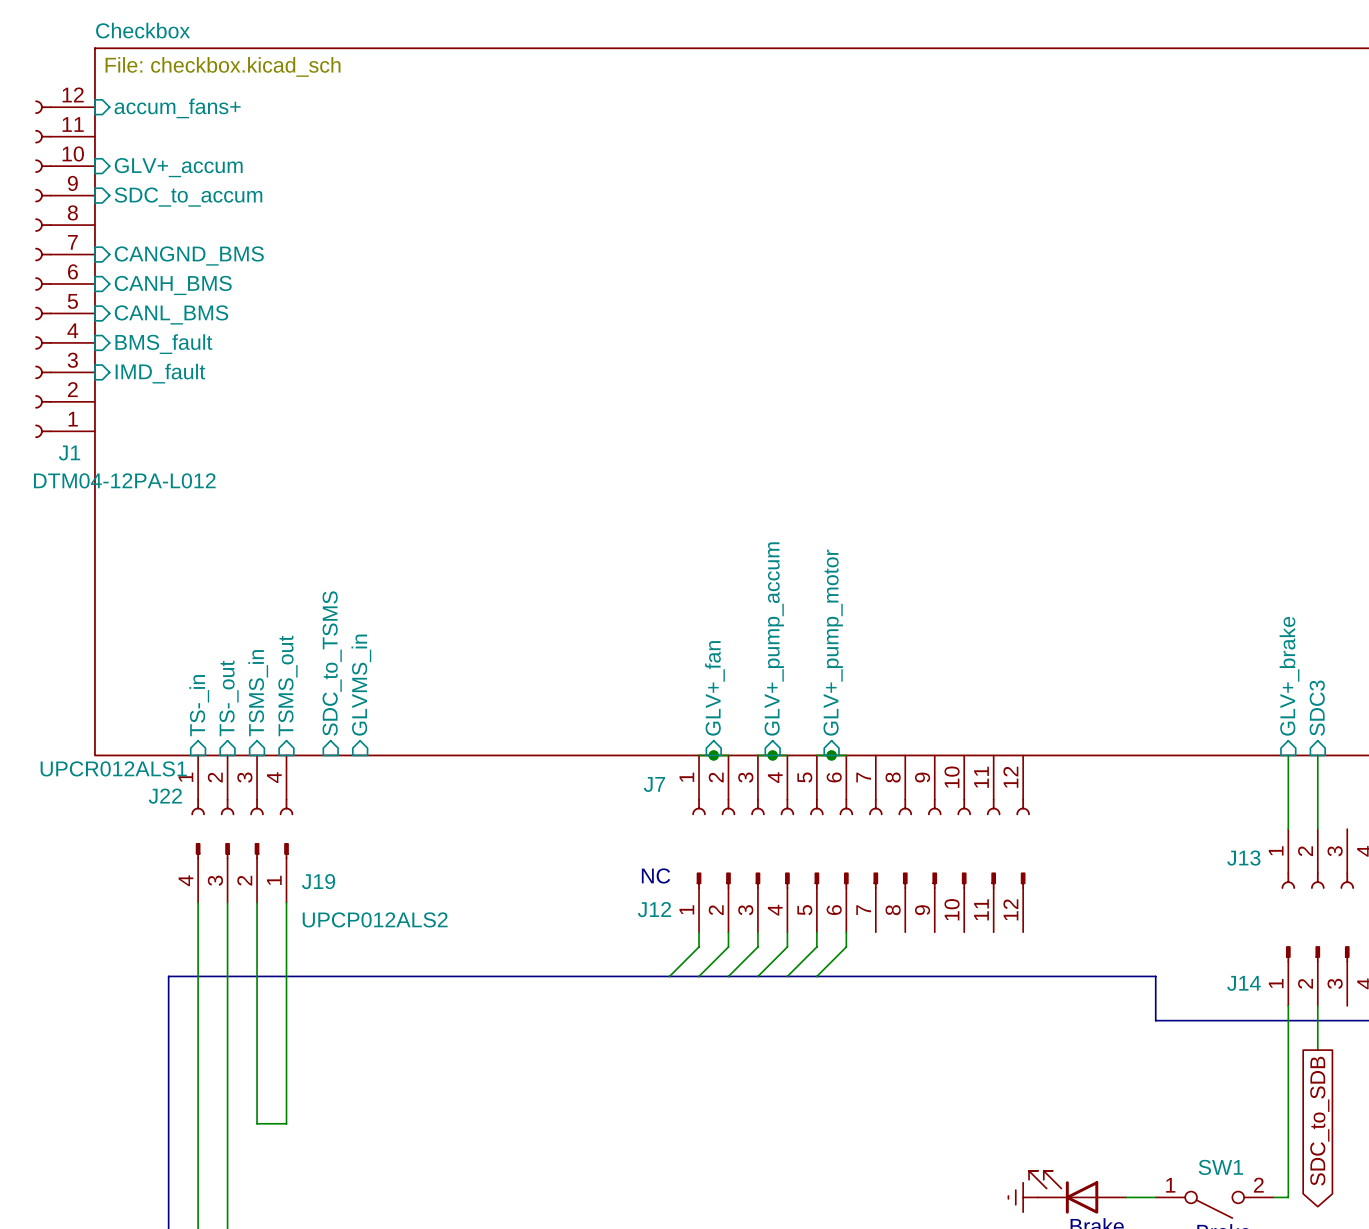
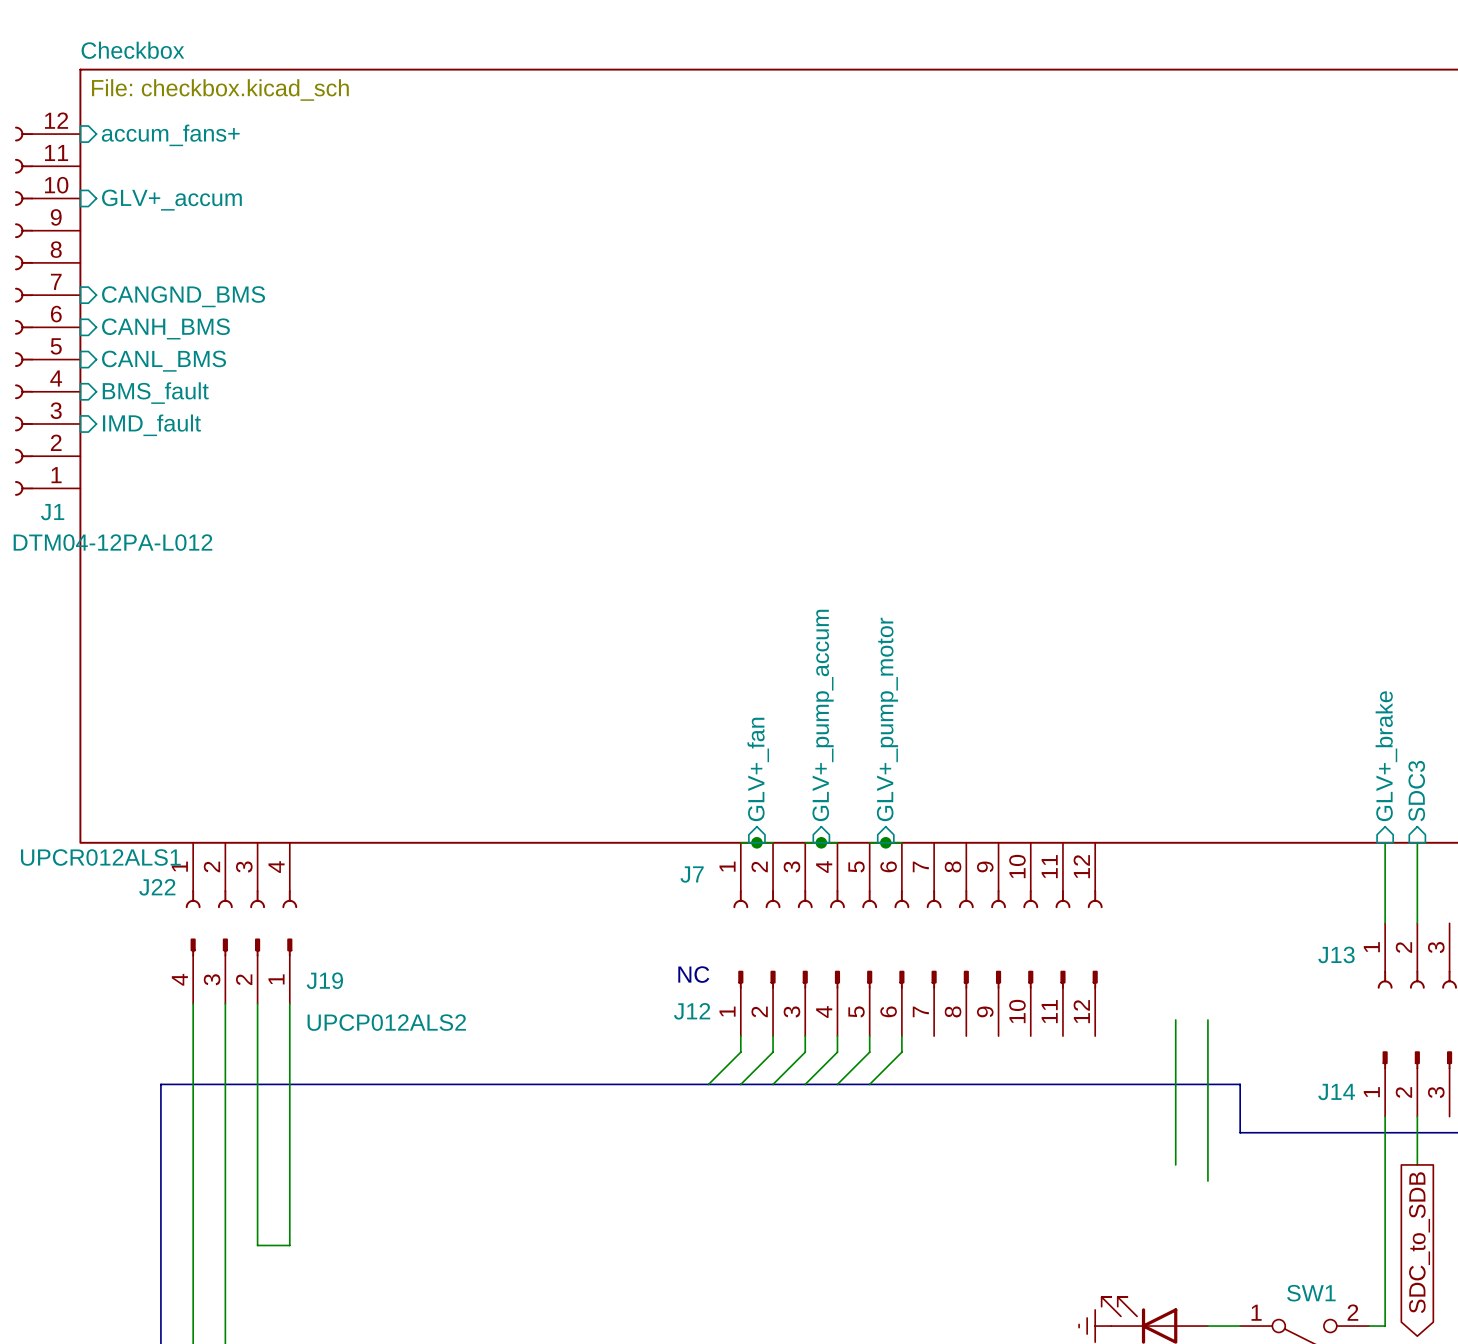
sheet pin: SDC_to_accum (188, 197) -> none
sheet pin: SDC_to_TSMS (332, 663) -> none
sheet pin: TSMS_out (287, 685) -> none
sheet pin: GLVMS_in (361, 685) -> none
sheet pin: TSMS_in (258, 693) -> none
sheet pin: TS-_out (229, 698) -> none
sheet pin: TS-_in (199, 705) -> none
wire: none -> (1175, 1019) (1175, 1164)
wire: none -> (1207, 1019) (1207, 1181)

